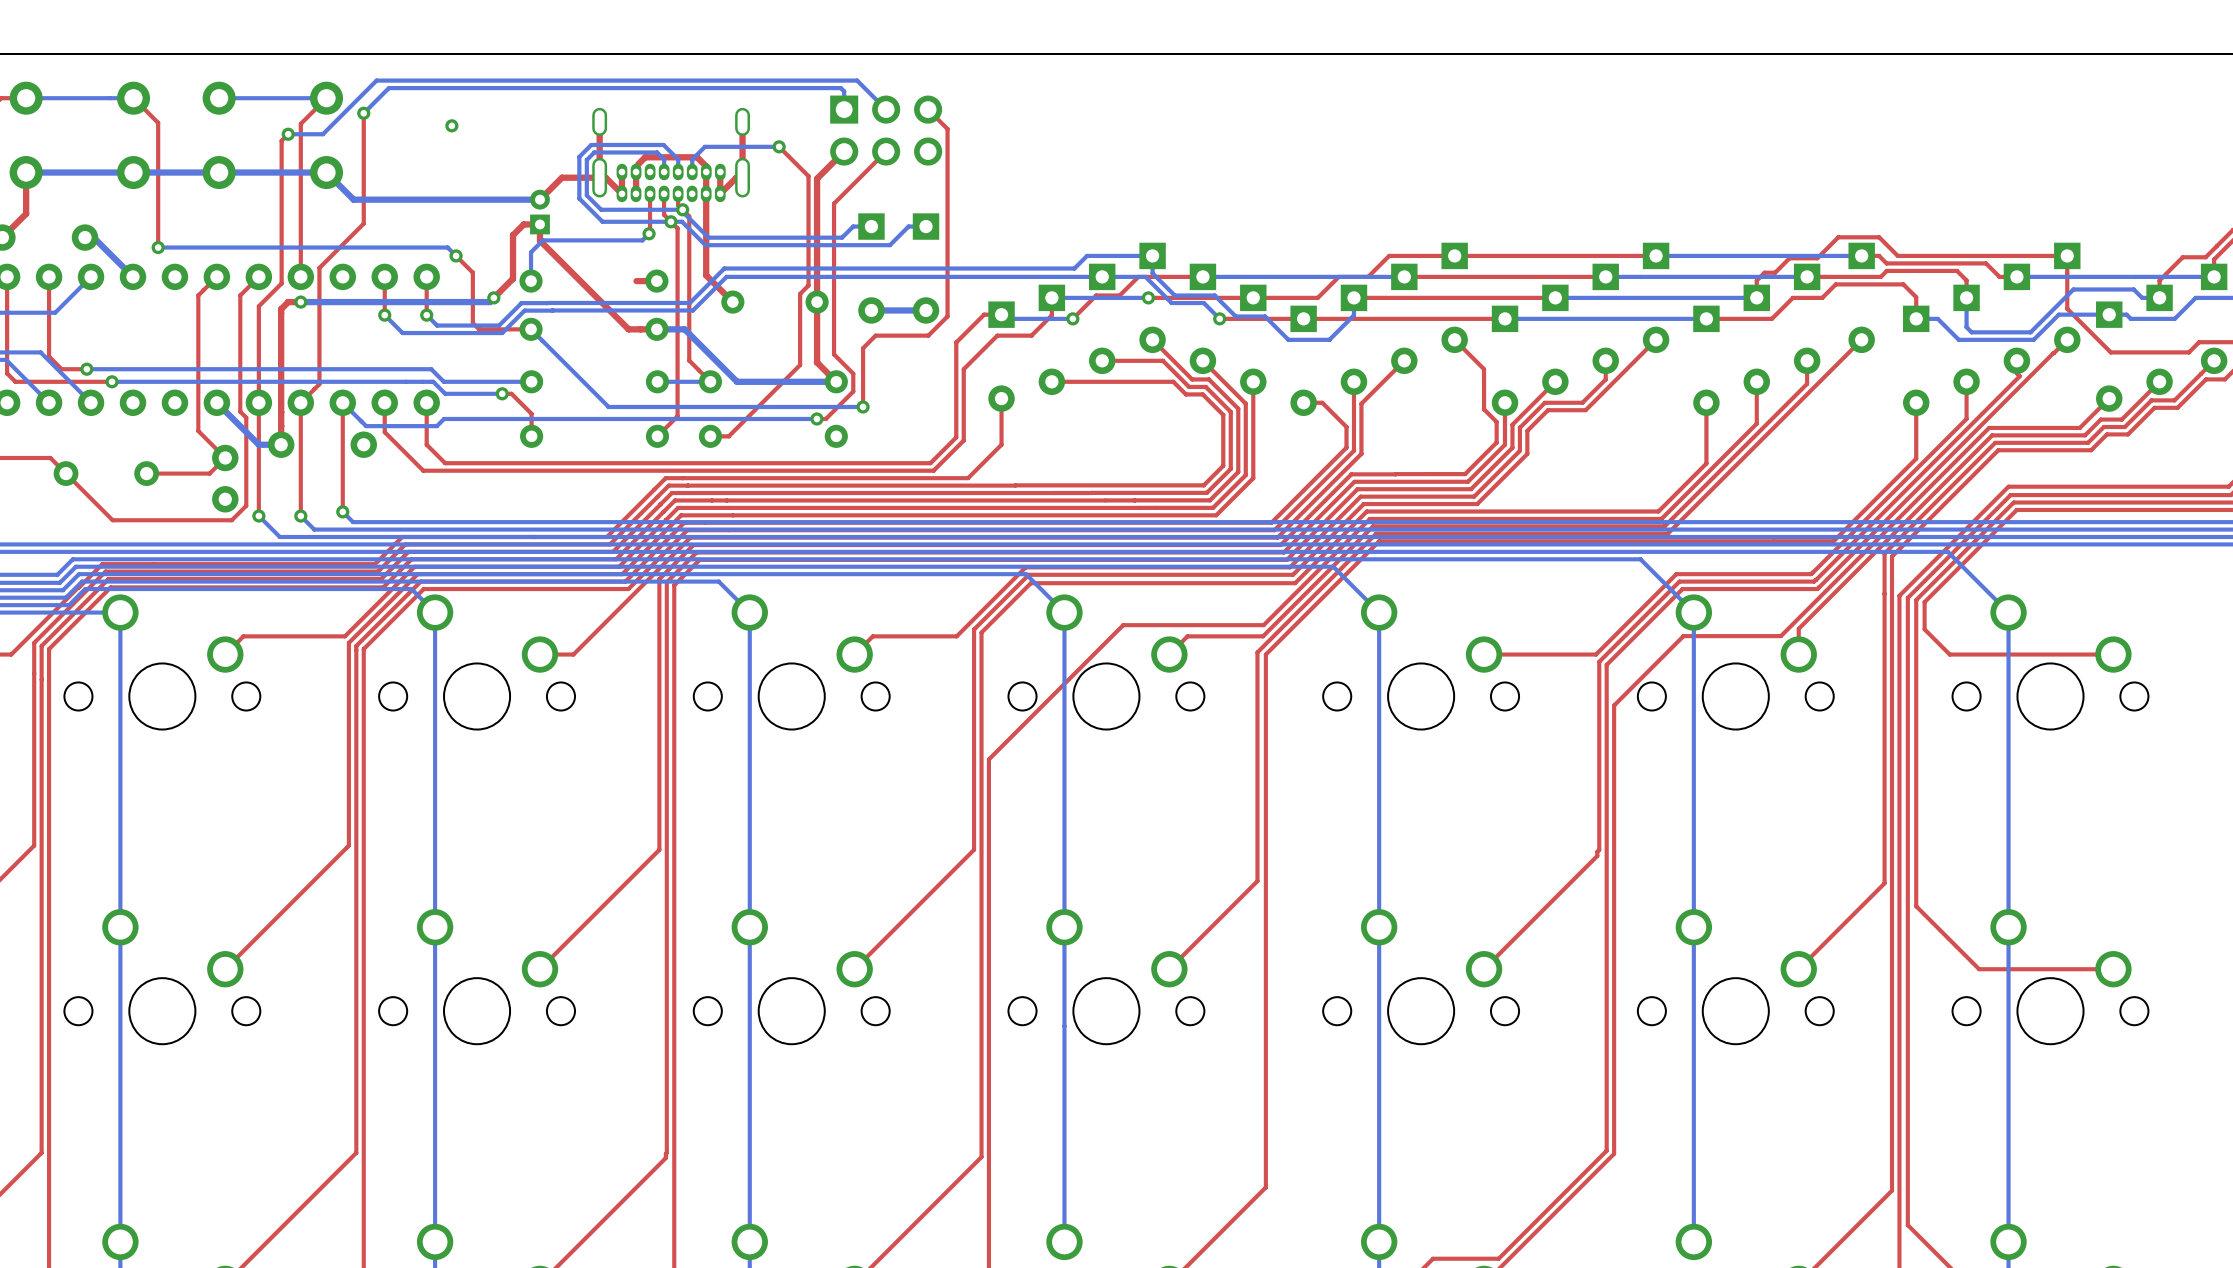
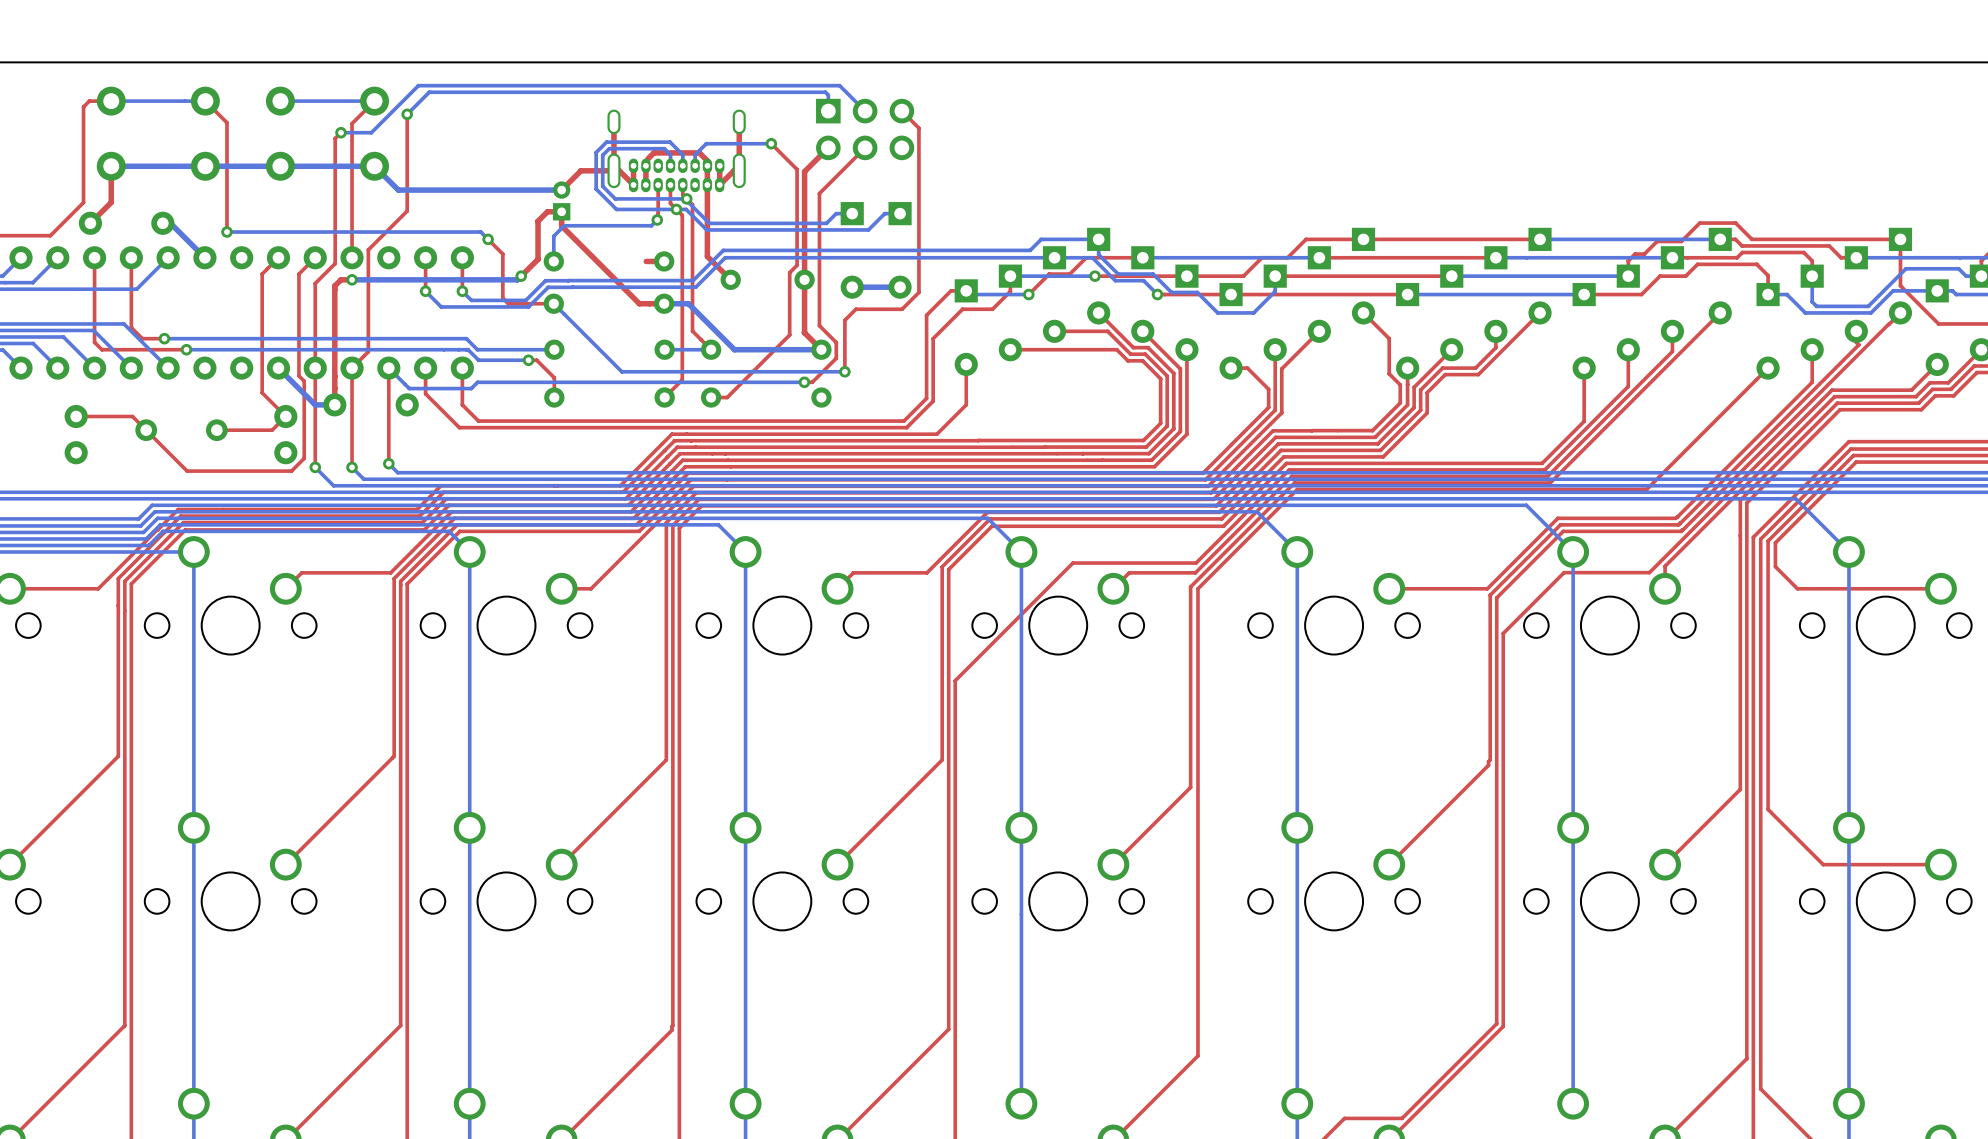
via: (451, 125) -> none
top track: (1916, 402) (1916, 458) (1833, 541) (1777, 541) -> (1768, 368) (1646, 489)

